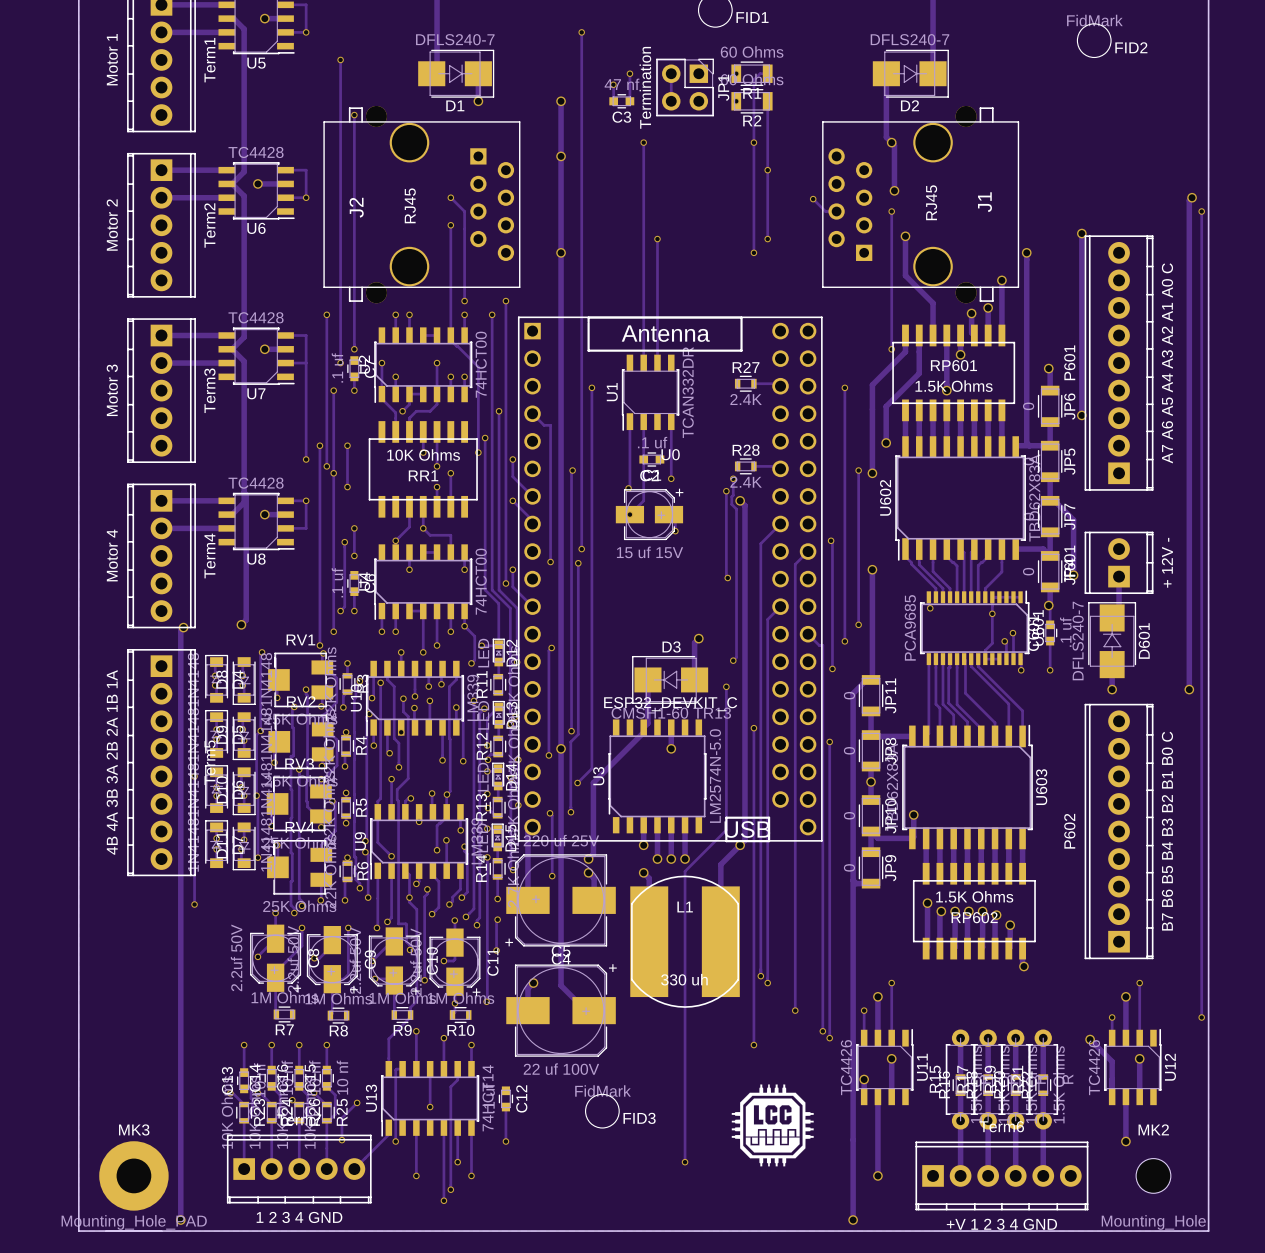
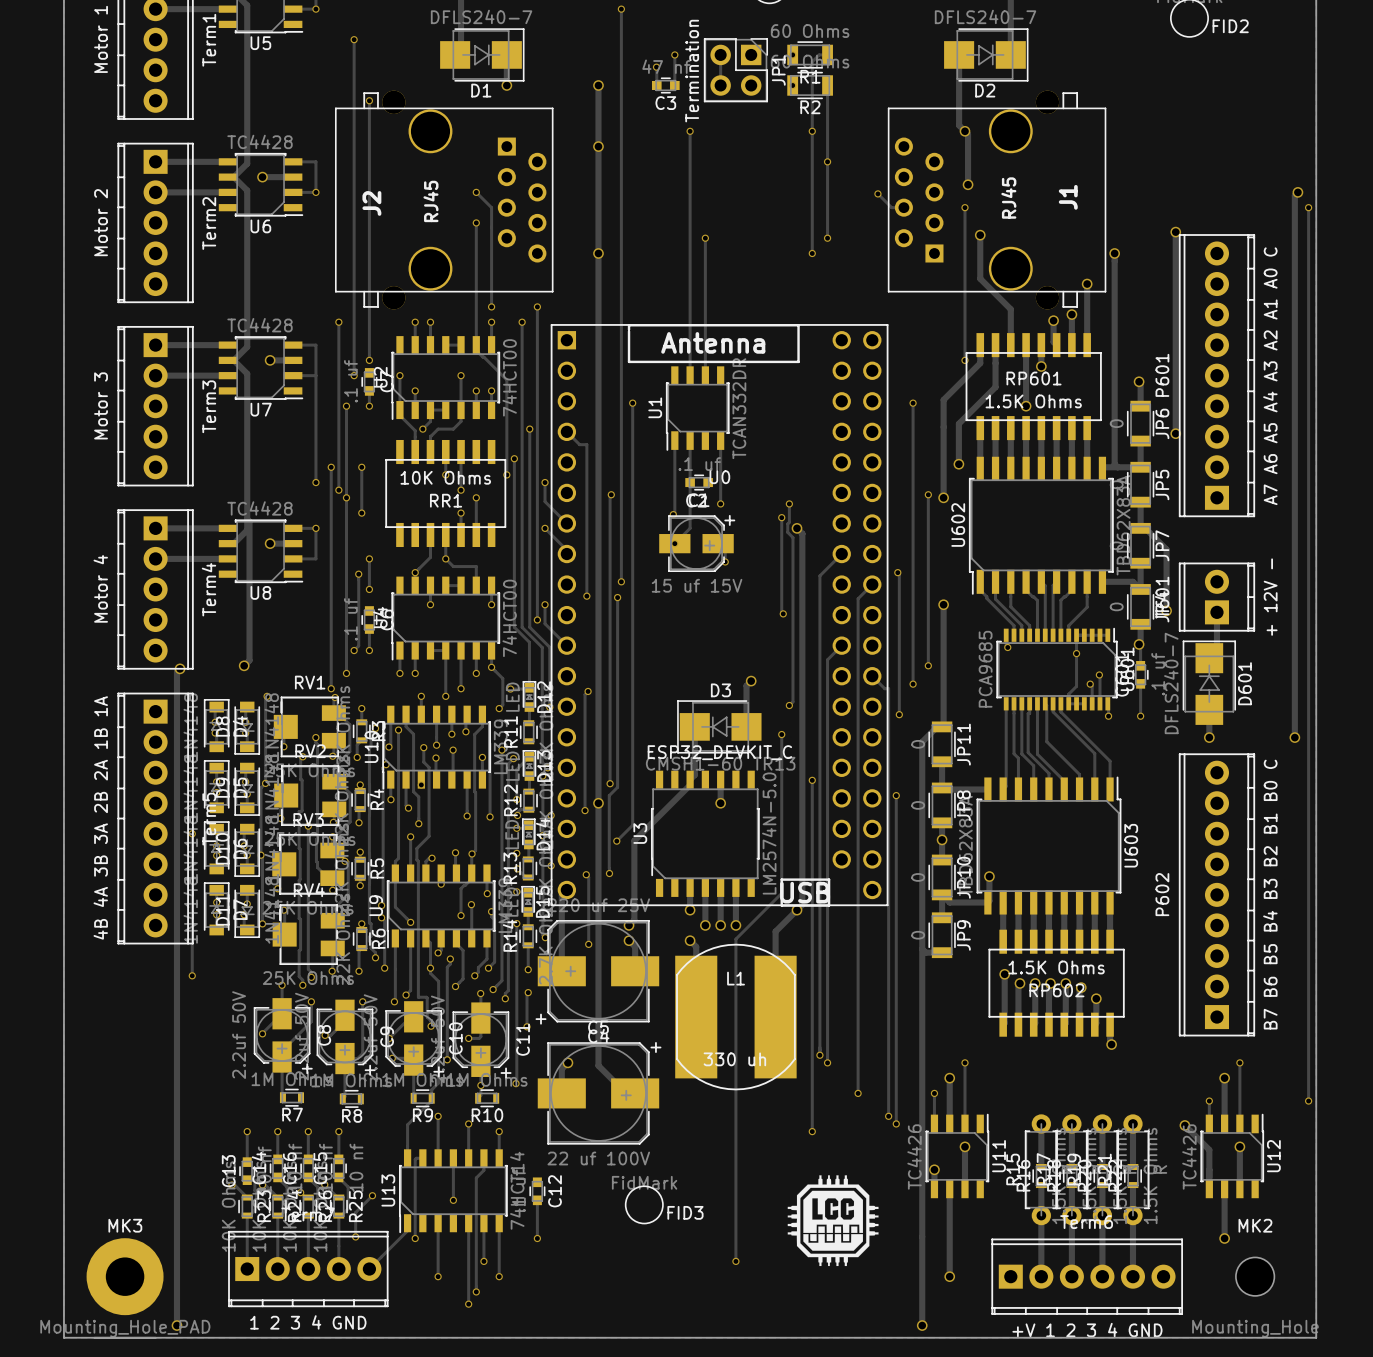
R27: 2.4K (745, 383) -> none
track: (753, 383) (778, 383) (780, 386) -> none
R28: 2.4K (745, 466) -> none
track: (753, 466) (778, 466) (780, 468) -> none

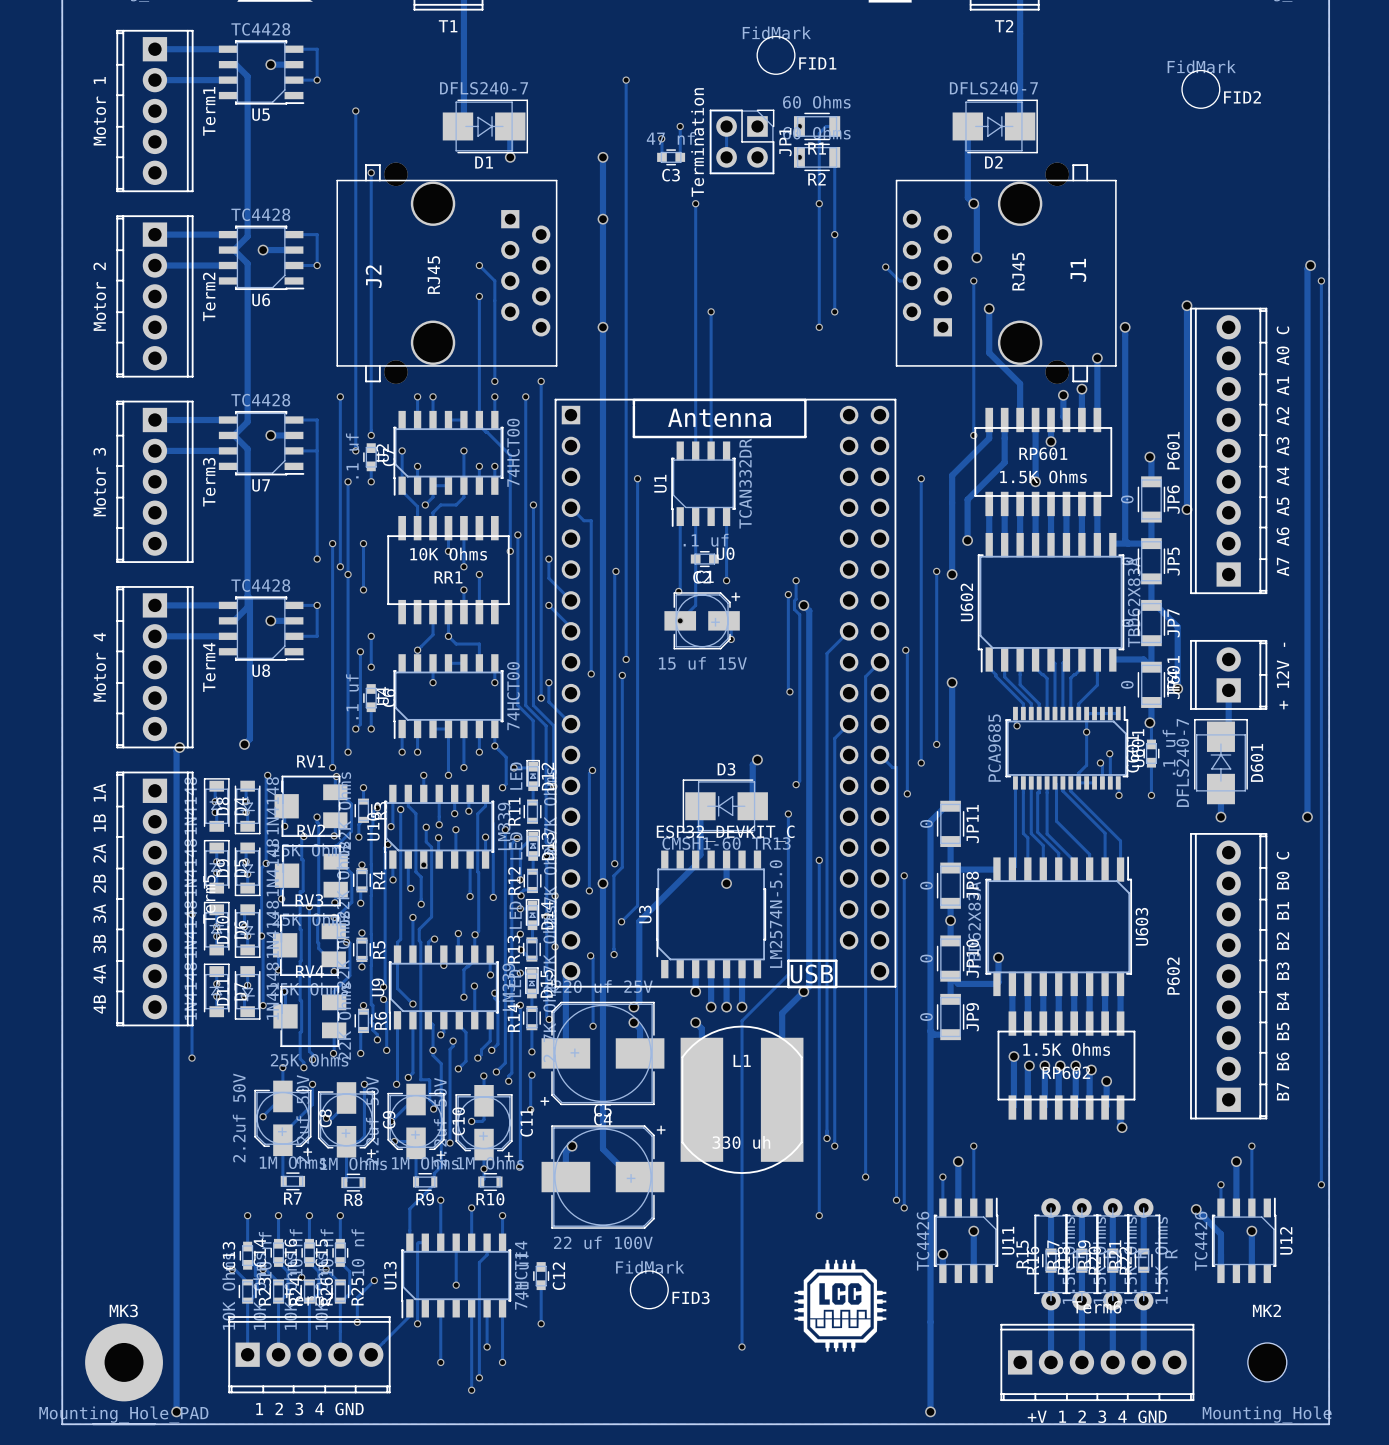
track: (949, 1188) (949, 1276) -> none
track: (1224, 1188) (1224, 1238) -> none
via: (1224, 1238) -> none
via: (949, 1276) -> none

